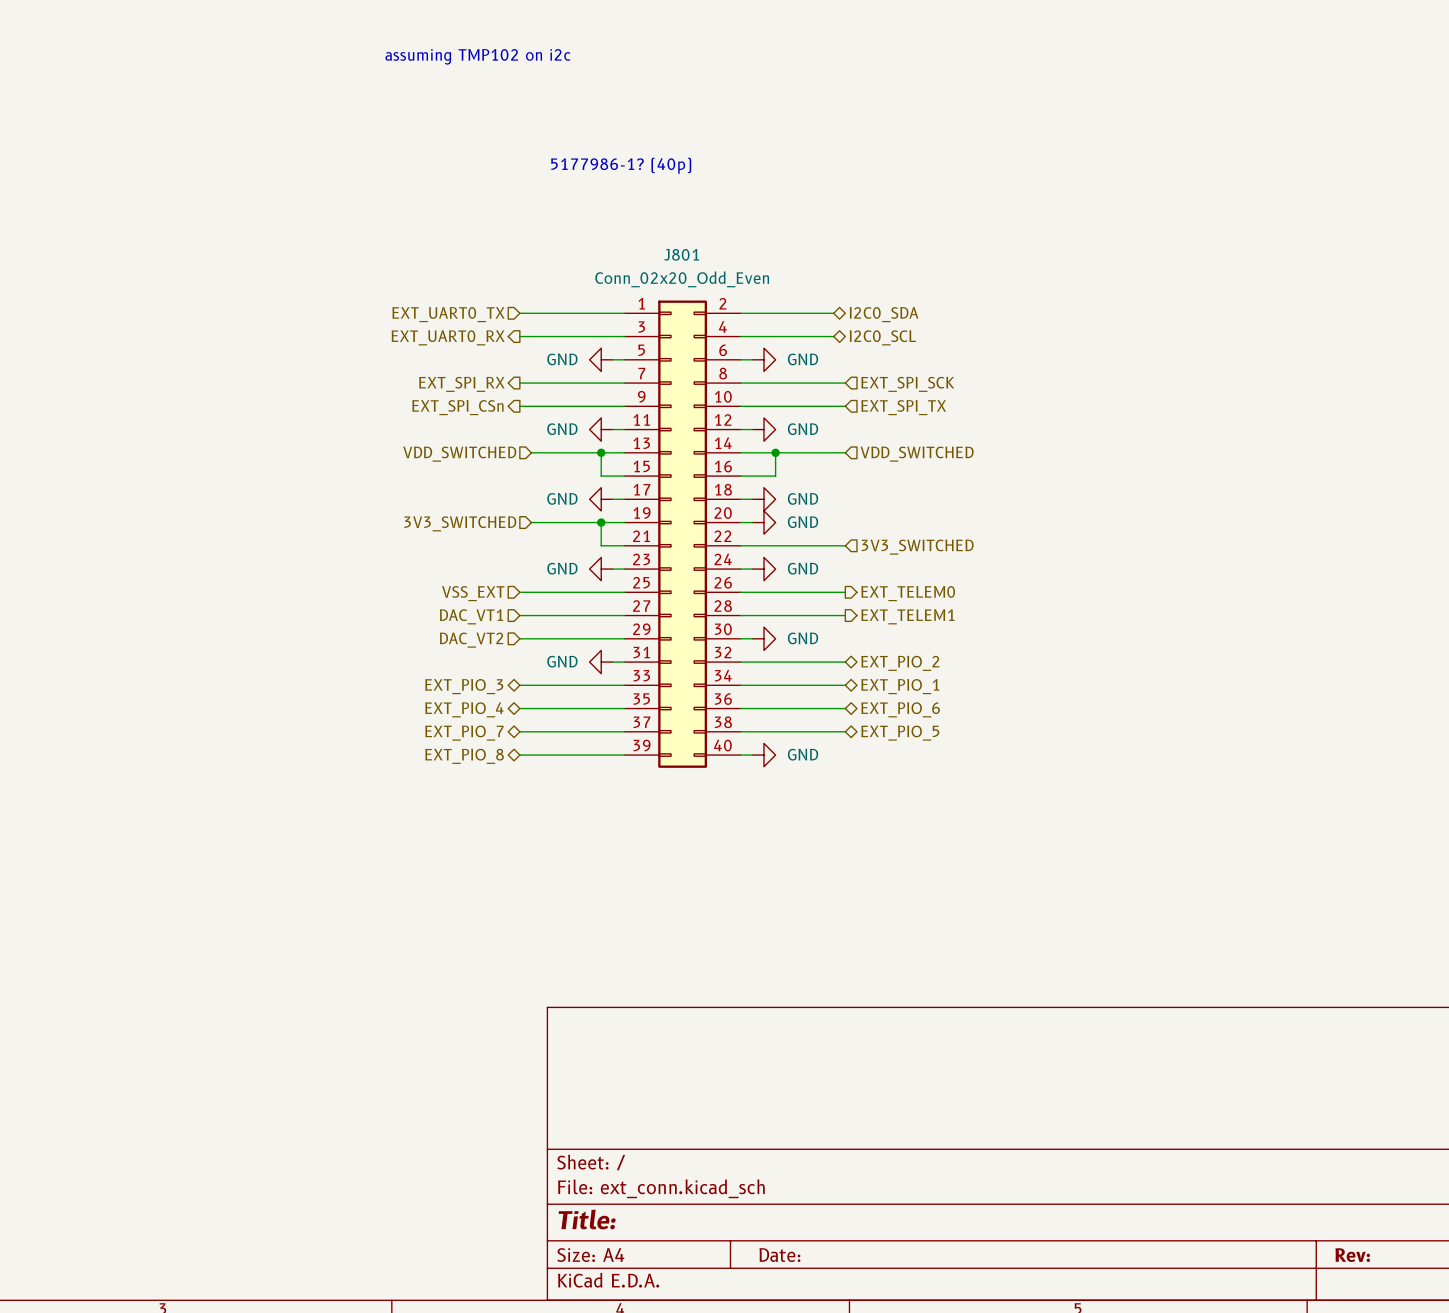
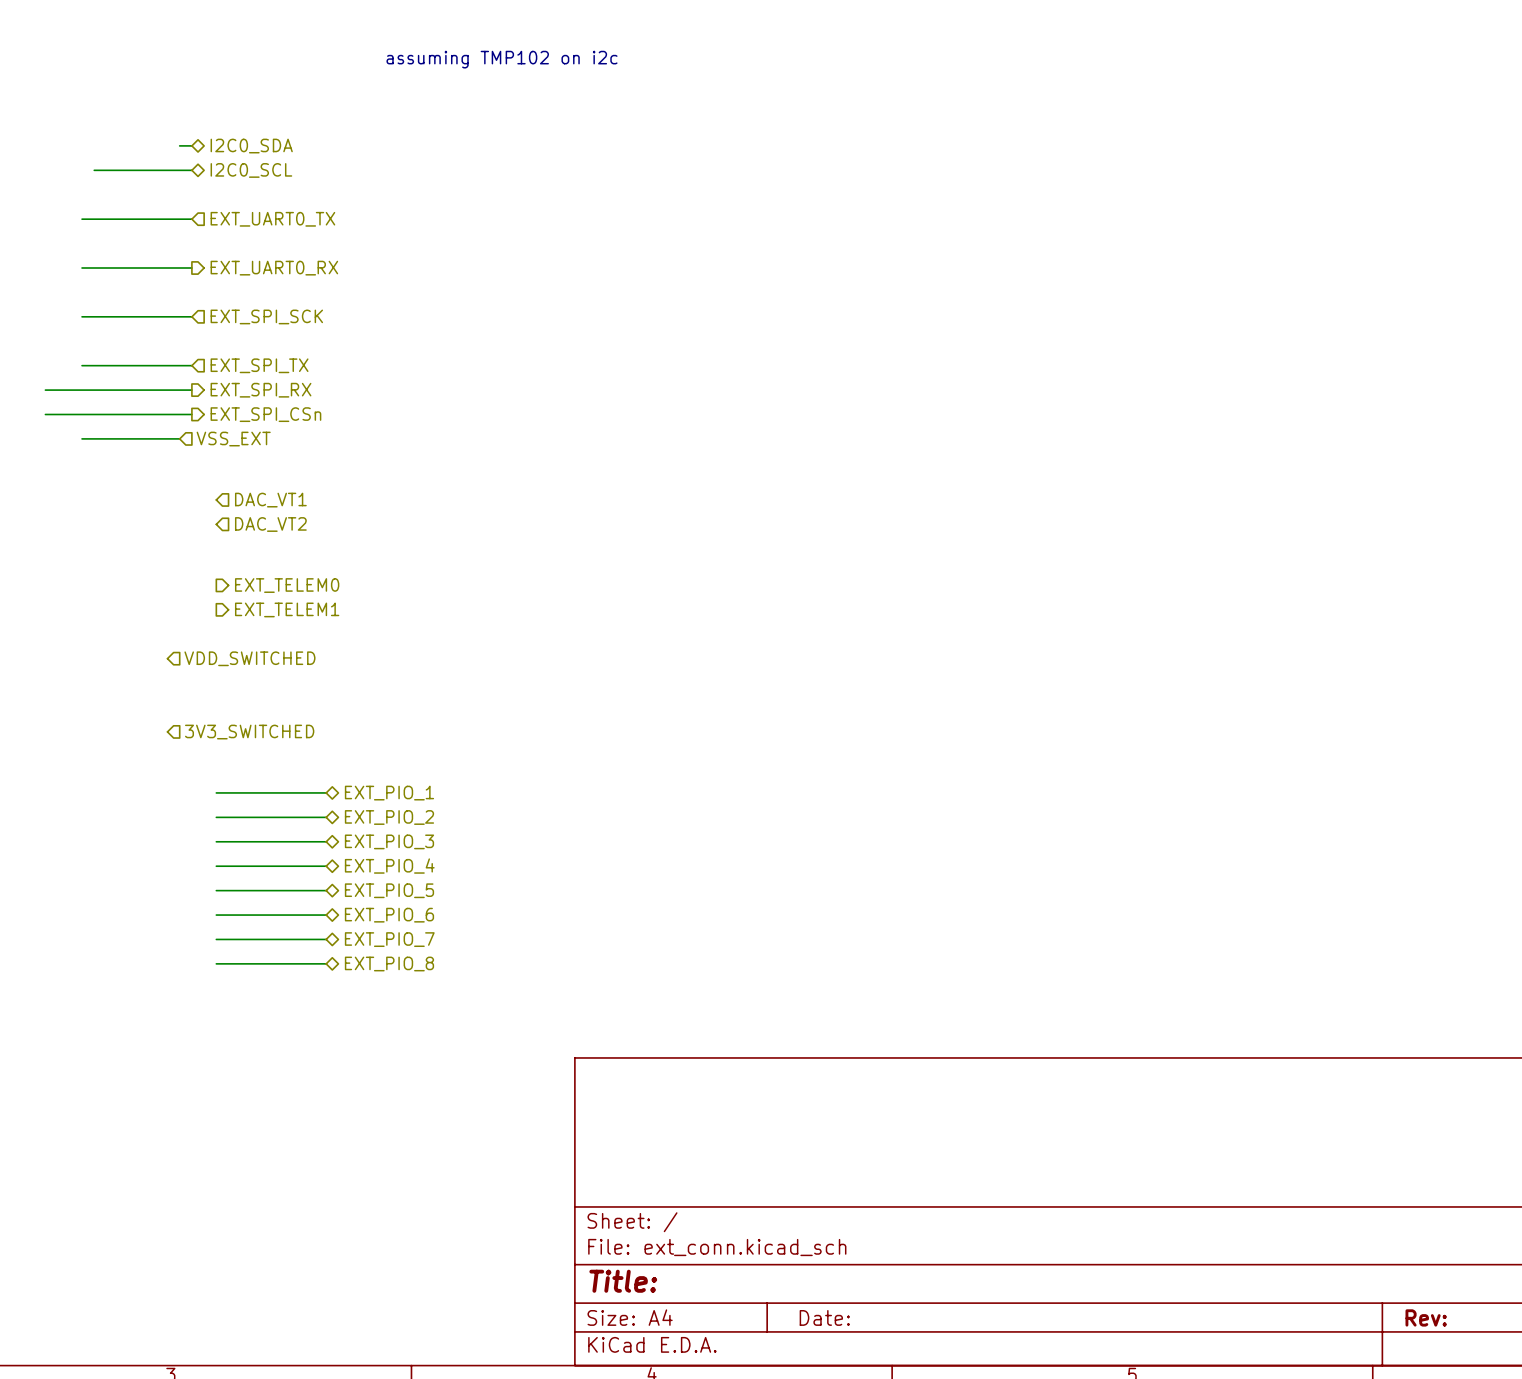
wire: none -> (179, 145) (191, 145)
hierarchical label: none -> I2C0_SDA (251, 146)
wire: none -> (94, 170) (191, 170)
hierarchical label: none -> I2C0_SCL (251, 170)
text: 5177986-1? (40p) (621, 165) -> none
wire: none -> (82, 219) (191, 219)
hierarchical label: none -> EXT_UART0_TX (272, 219)
wire: none -> (82, 268) (191, 268)
hierarchical label: none -> EXT_UART0_RX (274, 268)
wire: none -> (82, 316) (191, 316)
hierarchical label: none -> EXT_SPI_SCK (266, 316)
wire: (519, 313) (624, 313) -> none
wire: (740, 313) (833, 313) -> none
hierarchical label: EXT_UART0_TX (448, 314) -> none
hierarchical label: I2C0_SDA (884, 314) -> none
wire: (519, 336) (624, 336) -> none
wire: (740, 336) (833, 336) -> none
hierarchical label: EXT_UART0_RX (448, 337) -> none
hierarchical label: I2C0_SCL (882, 337) -> none
wire: none -> (82, 365) (191, 365)
hierarchical label: none -> EXT_SPI_TX (259, 365)
power symbol: GND (601, 359) -> none
wire: (612, 359) (624, 359) -> none
wire: (740, 359) (752, 359) -> none
power symbol: GND (763, 359) -> none
wire: none -> (45, 390) (191, 390)
hierarchical label: none -> EXT_SPI_RX (261, 390)
wire: (519, 383) (624, 383) -> none
wire: (740, 383) (845, 383) -> none
hierarchical label: EXT_SPI_RX (461, 384) -> none
hierarchical label: EXT_SPI_SCK (907, 384) -> none
wire: none -> (45, 414) (191, 414)
hierarchical label: none -> EXT_SPI_CSn (265, 414)
wire: (519, 406) (624, 406) -> none
wire: (740, 406) (845, 406) -> none
hierarchical label: EXT_SPI_CSn (457, 407) -> none
hierarchical label: EXT_SPI_TX (903, 407) -> none
wire: none -> (82, 438) (179, 438)
hierarchical label: none -> VSS_EXT (233, 439)
power symbol: GND (601, 429) -> none
wire: (612, 429) (624, 429) -> none
wire: (740, 429) (752, 429) -> none
power symbol: GND (763, 429) -> none
wire: (531, 452) (624, 452) -> none
wire: (601, 452) (601, 476) (624, 476) -> none
junction: (601, 452) -> none
wire: (740, 452) (845, 452) -> none
wire: (775, 452) (775, 476) (740, 476) -> none
junction: (775, 452) -> none
hierarchical label: VDD_SWITCHED (459, 454) -> none
hierarchical label: VDD_SWITCHED (917, 454) -> none
hierarchical label: none -> DAC_VT1 (270, 500)
power symbol: GND (601, 499) -> none
wire: (612, 499) (624, 499) -> none
wire: (740, 499) (752, 499) -> none
power symbol: GND (763, 499) -> none
hierarchical label: none -> DAC_VT2 (270, 524)
wire: (531, 522) (624, 522) -> none
wire: (601, 522) (601, 545) (624, 545) -> none
junction: (601, 522) -> none
wire: (740, 522) (752, 522) -> none
power symbol: GND (763, 522) -> none
hierarchical label: 3V3_SWITCHED (460, 523) -> none
J801: Conn_02x20_Odd_Even (682, 534) -> none
wire: (740, 545) (845, 545) -> none
hierarchical label: 3V3_SWITCHED (917, 547) -> none
hierarchical label: none -> EXT_TELEM0 (287, 585)
power symbol: GND (601, 569) -> none
wire: (612, 569) (624, 569) -> none
wire: (740, 569) (752, 569) -> none
power symbol: GND (763, 569) -> none
hierarchical label: none -> EXT_TELEM1 (287, 609)
wire: (519, 592) (624, 592) -> none
wire: (740, 592) (845, 592) -> none
hierarchical label: VSS_EXT (473, 593) -> none
hierarchical label: EXT_TELEM0 (908, 593) -> none
wire: (519, 615) (624, 615) -> none
wire: (740, 615) (845, 615) -> none
hierarchical label: DAC_VT1 (471, 616) -> none
hierarchical label: EXT_TELEM1 (907, 616) -> none
hierarchical label: none -> VDD_SWITCHED (249, 658)
wire: (519, 638) (624, 638) -> none
wire: (740, 638) (752, 638) -> none
power symbol: GND (763, 638) -> none
hierarchical label: DAC_VT2 (471, 640) -> none
power symbol: GND (601, 662) -> none
wire: (612, 662) (624, 662) -> none
wire: (740, 662) (845, 662) -> none
hierarchical label: EXT_PIO_2 (900, 663) -> none
wire: (519, 685) (624, 685) -> none
wire: (740, 685) (845, 685) -> none
hierarchical label rotation: 0° (464, 686) -> 180° (389, 841)
hierarchical label position: EXT_PIO_3 (464, 686) -> EXT_PIO_3 (389, 841)
hierarchical label: EXT_PIO_1 (900, 686) -> none
hierarchical label: none -> 3V3_SWITCHED (249, 732)
wire: (519, 708) (624, 708) -> none
wire: (740, 708) (845, 708) -> none
hierarchical label rotation: 0° (464, 709) -> 180° (389, 866)
hierarchical label position: EXT_PIO_4 (464, 709) -> EXT_PIO_4 (389, 866)
hierarchical label: EXT_PIO_6 (900, 709) -> none
wire: (519, 731) (624, 731) -> none
wire: (740, 731) (845, 731) -> none
hierarchical label: EXT_PIO_7 (464, 733) -> none
hierarchical label: EXT_PIO_5 (900, 733) -> none
wire: none -> (216, 792) (326, 792)
wire: (519, 755) (624, 755) -> none
wire: (740, 755) (752, 755) -> none
power symbol: GND (763, 755) -> none
hierarchical label: none -> EXT_PIO_1 (389, 793)
hierarchical label: EXT_PIO_8 (464, 756) -> none
wire: none -> (216, 817) (326, 817)
hierarchical label: none -> EXT_PIO_2 (389, 817)
wire: none -> (216, 841) (326, 841)
wire: none -> (216, 866) (326, 866)
wire: none -> (216, 890) (326, 890)
hierarchical label: none -> EXT_PIO_5 (389, 890)
wire: none -> (216, 915) (326, 915)
hierarchical label: none -> EXT_PIO_6 (389, 915)
wire: none -> (216, 939) (326, 939)
hierarchical label: none -> EXT_PIO_7 (389, 939)
wire: none -> (216, 963) (326, 963)
hierarchical label: none -> EXT_PIO_8 (389, 964)

